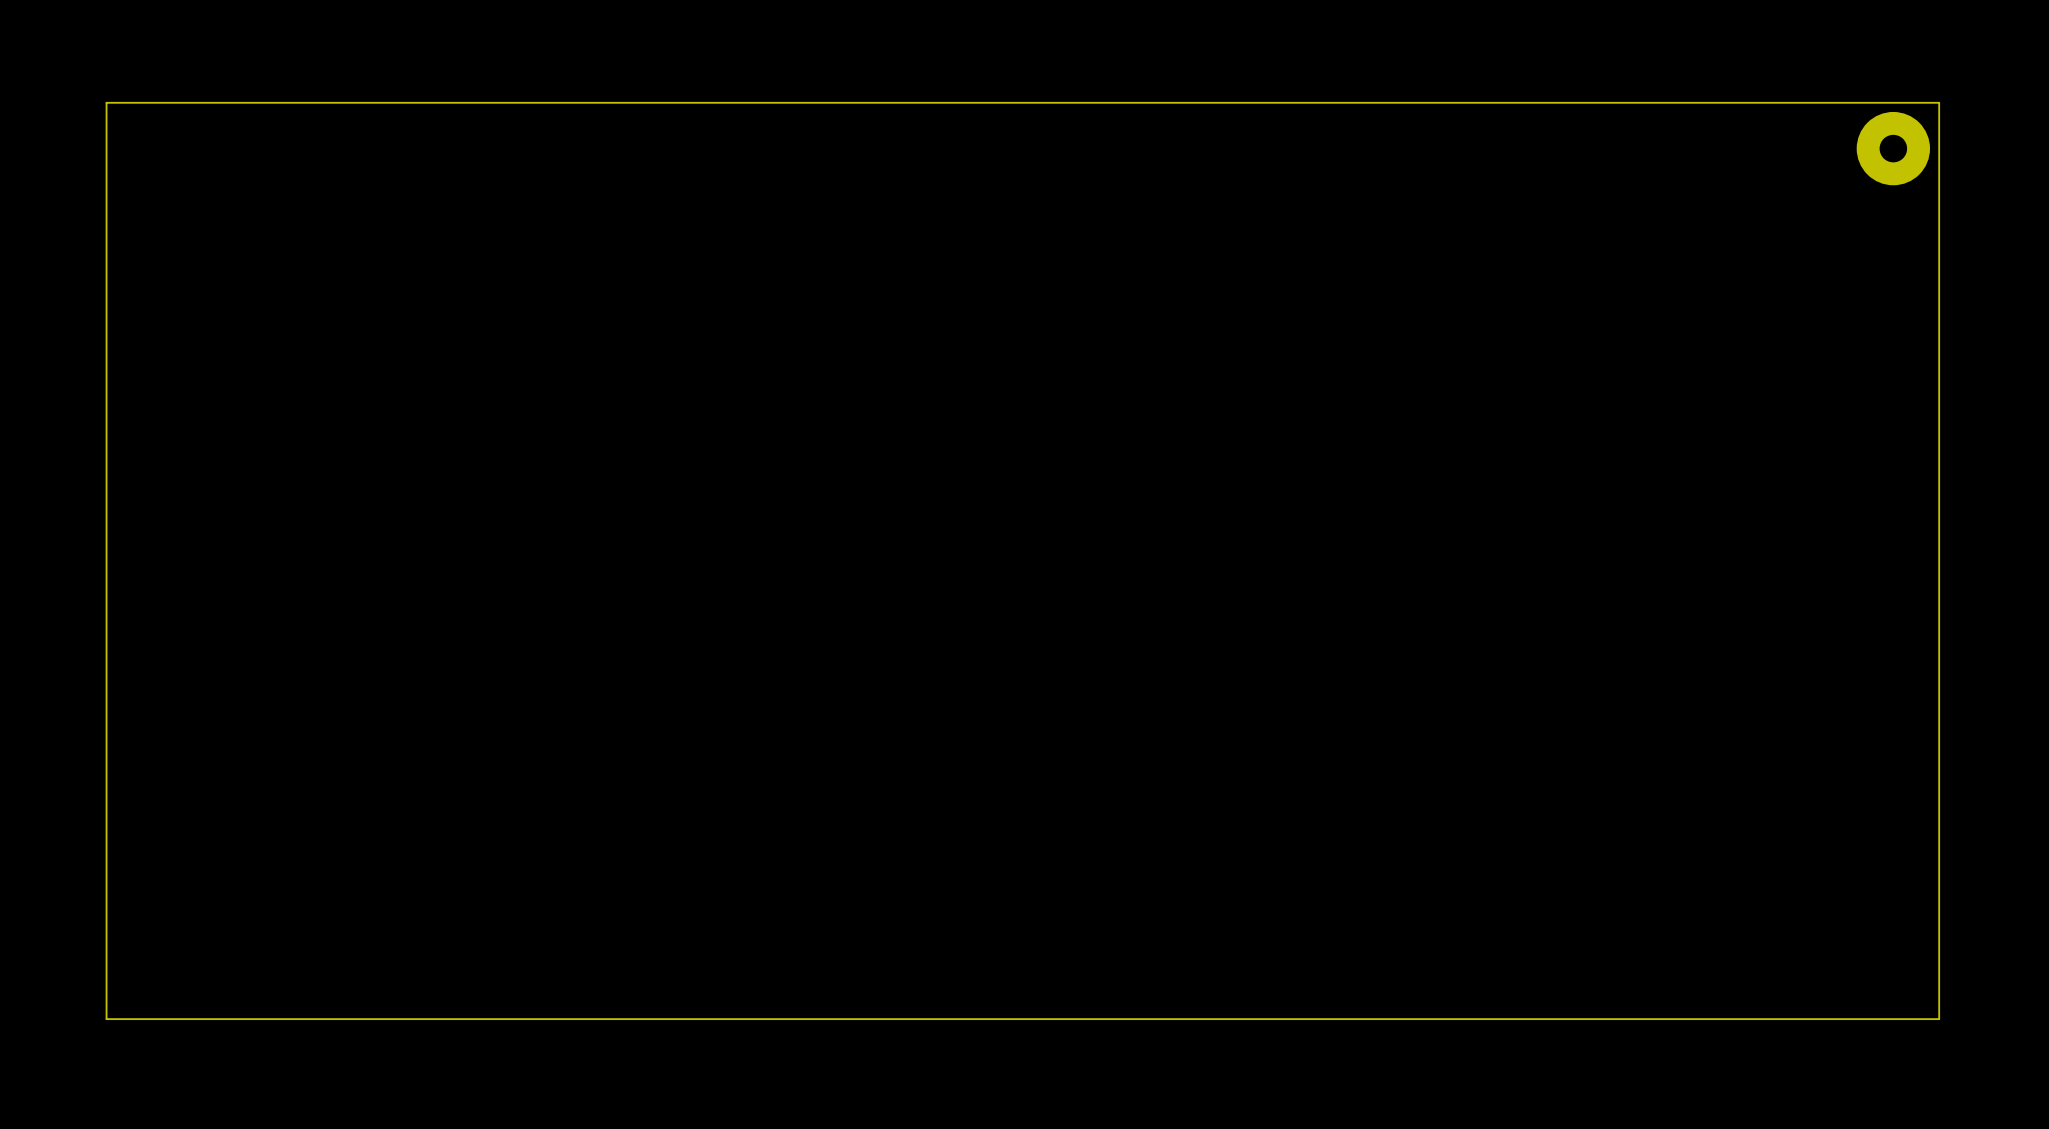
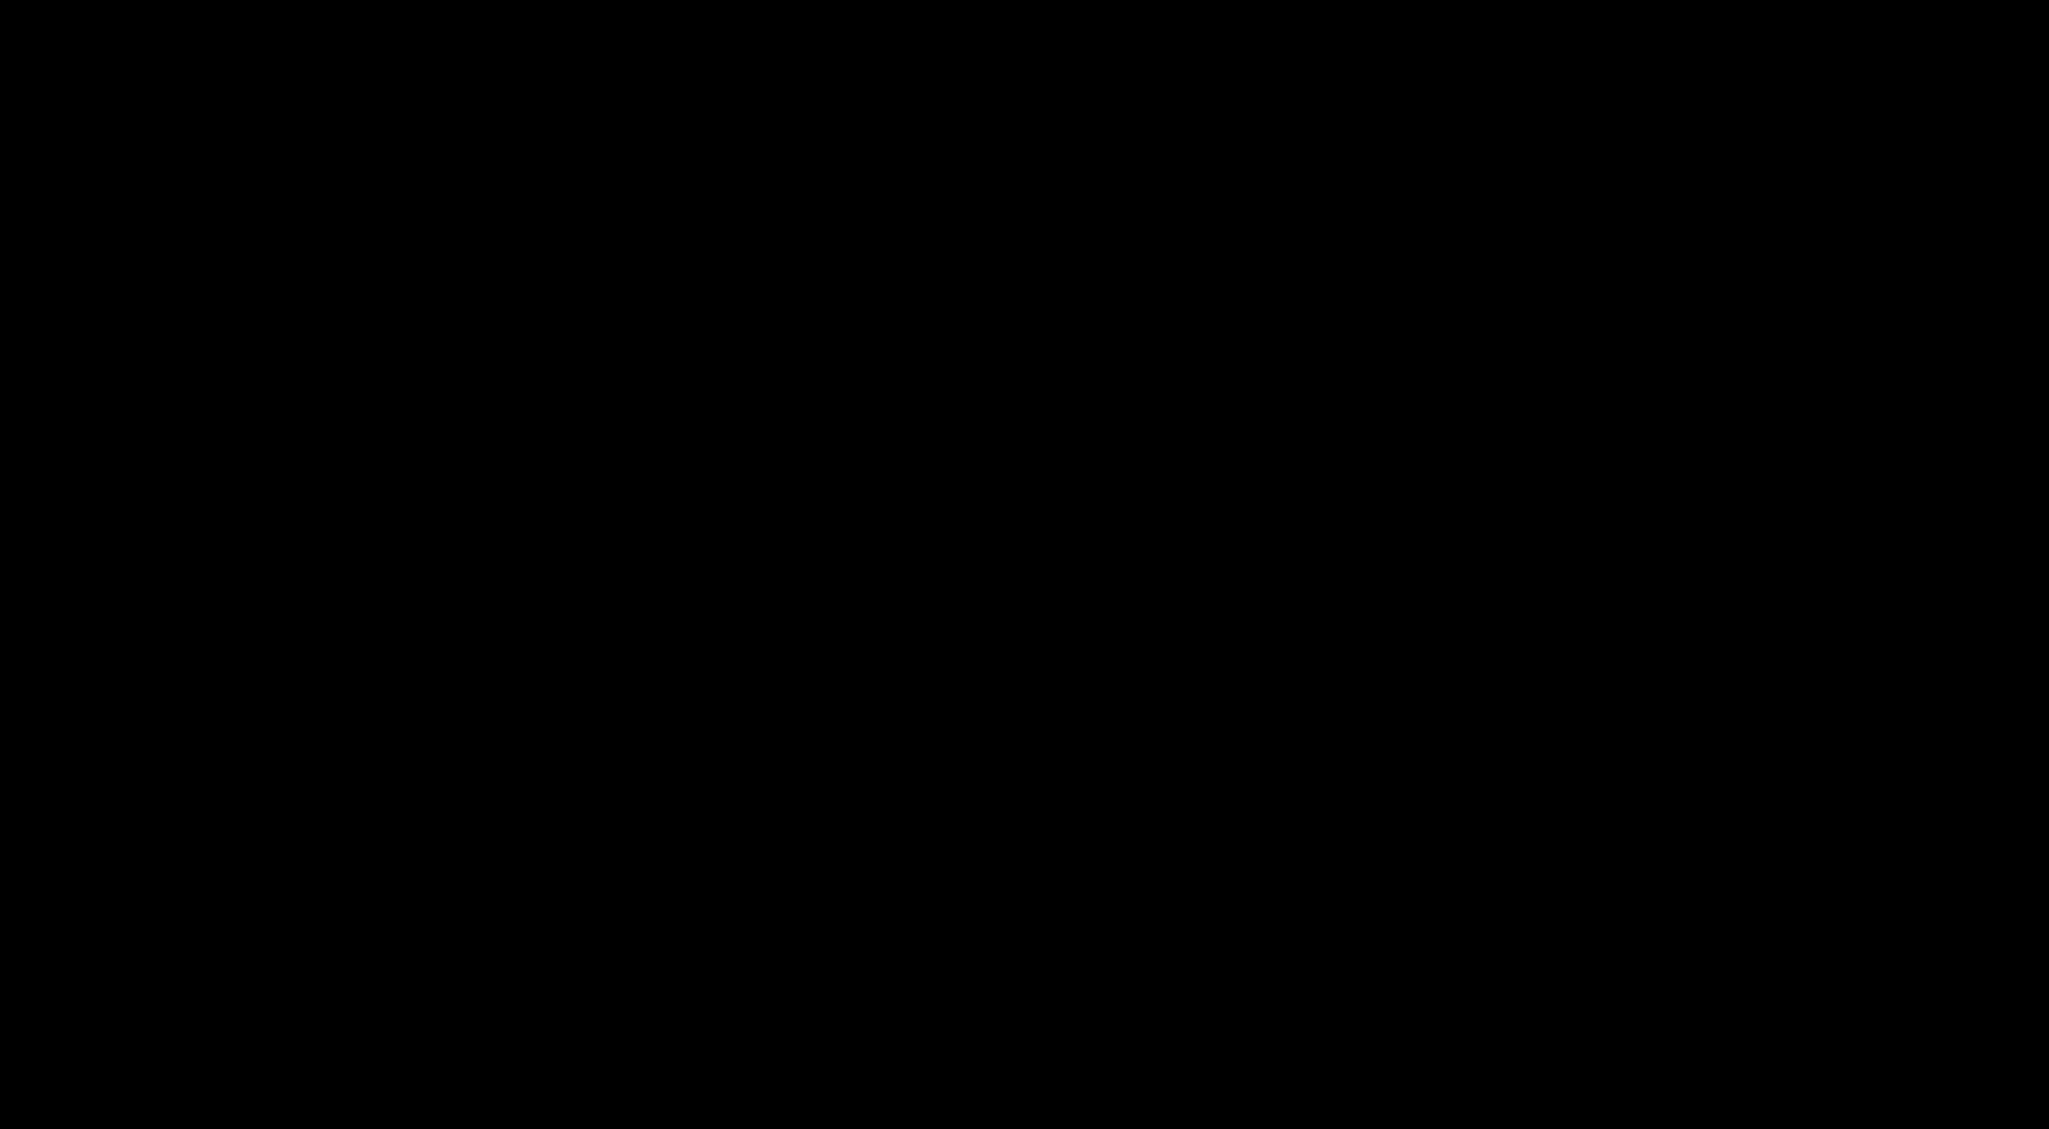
board edge: (1939, 102) (106, 102) (106, 1019) (1939, 1019) (1939, 102) -> none
part: (1893, 148) -> none

